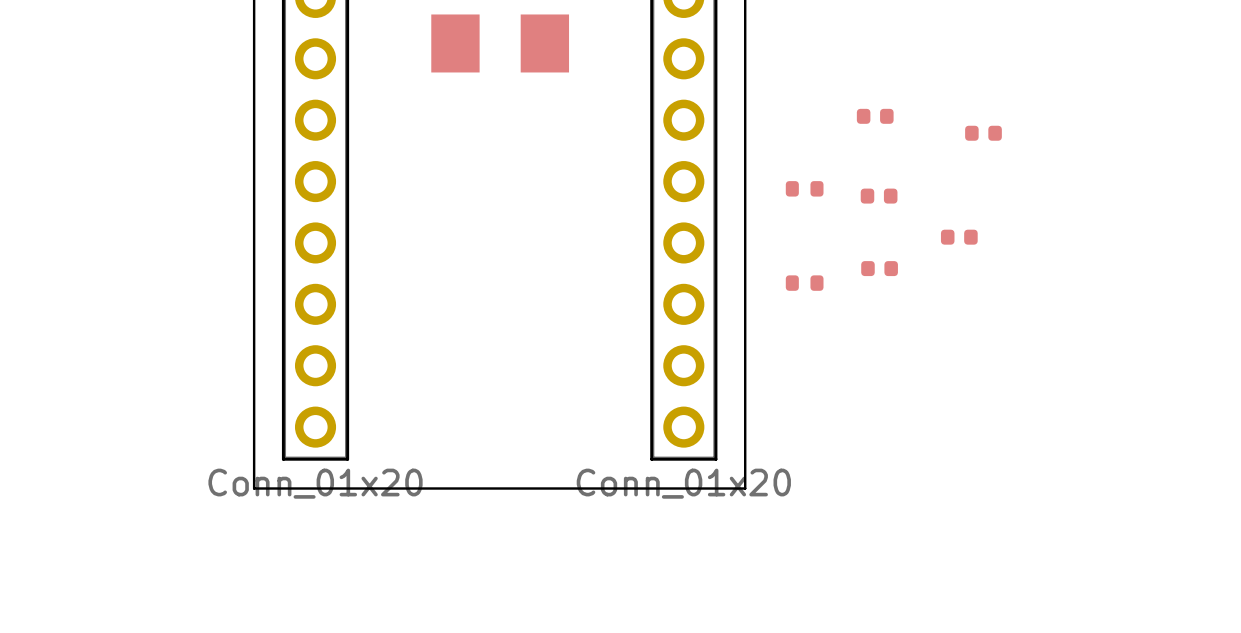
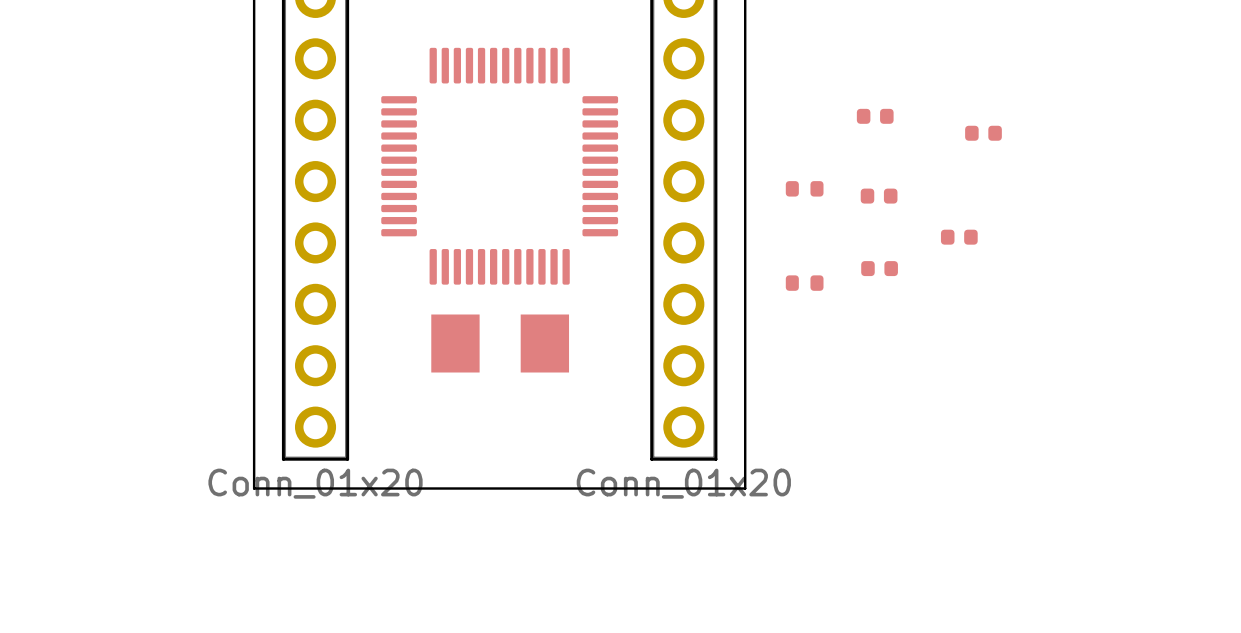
part position: (500, 43) -> (500, 343)
part: none -> (499, 166)

